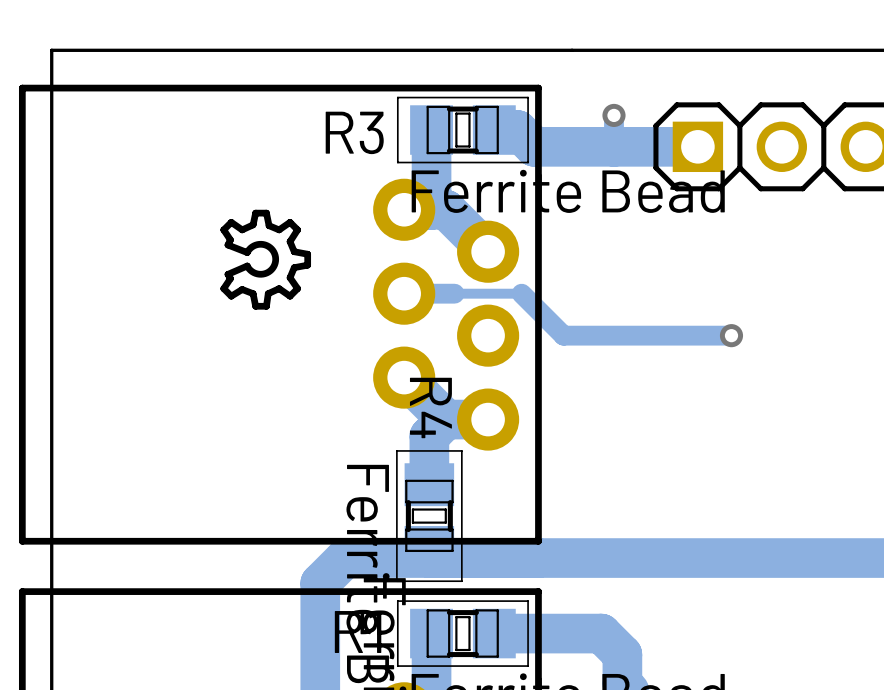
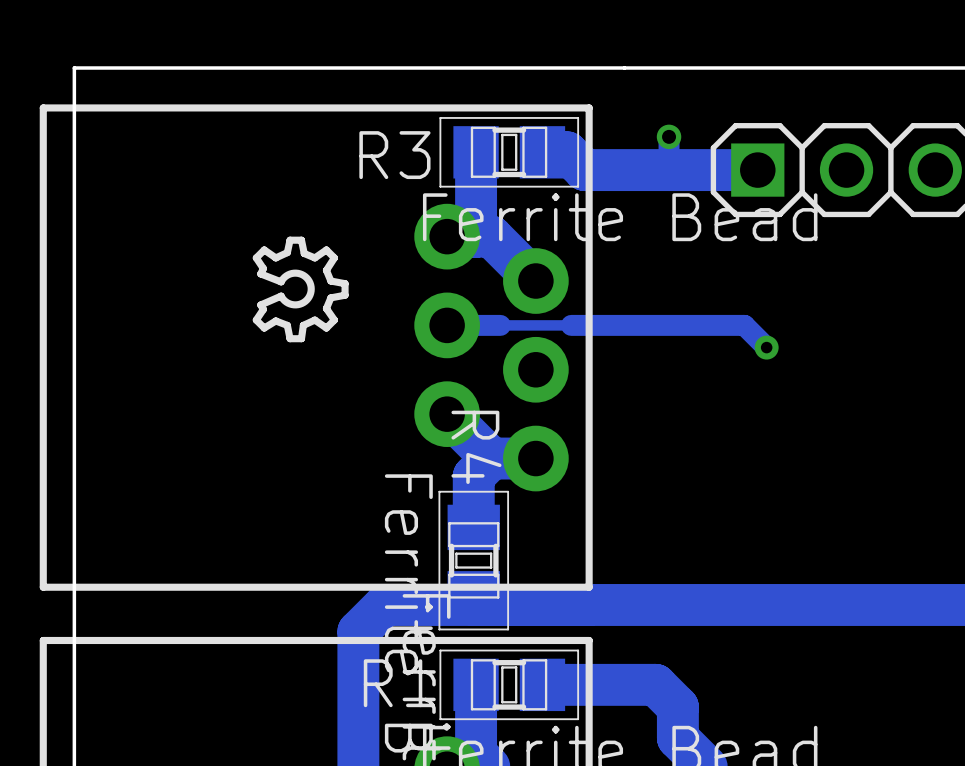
track: (521, 293) (563, 335) (731, 335) -> (571, 325) (744, 325) (766, 347)
via: none -> (766, 347)
via: (731, 335) -> none

